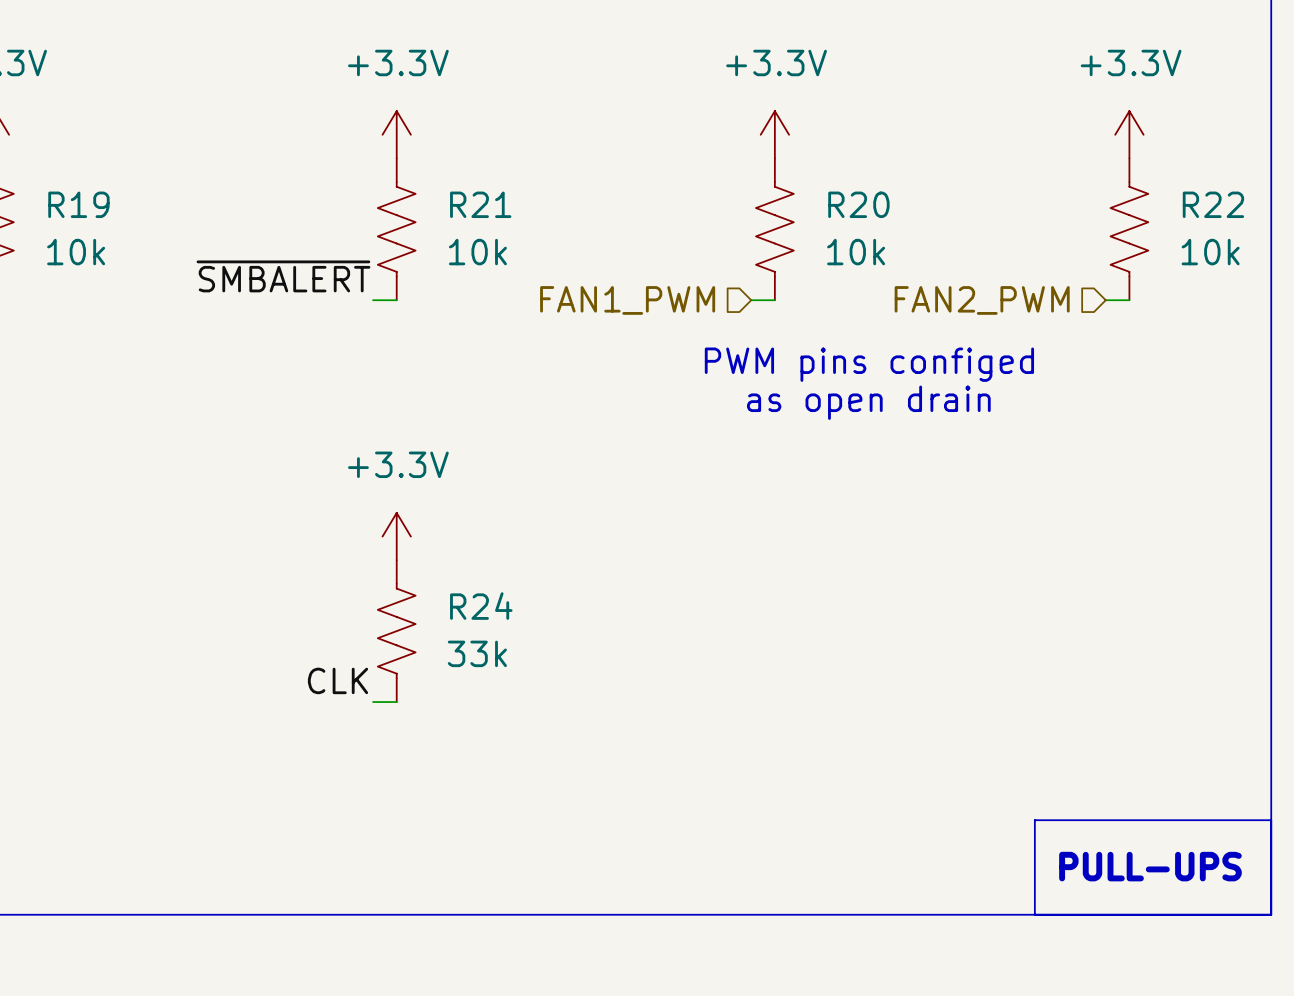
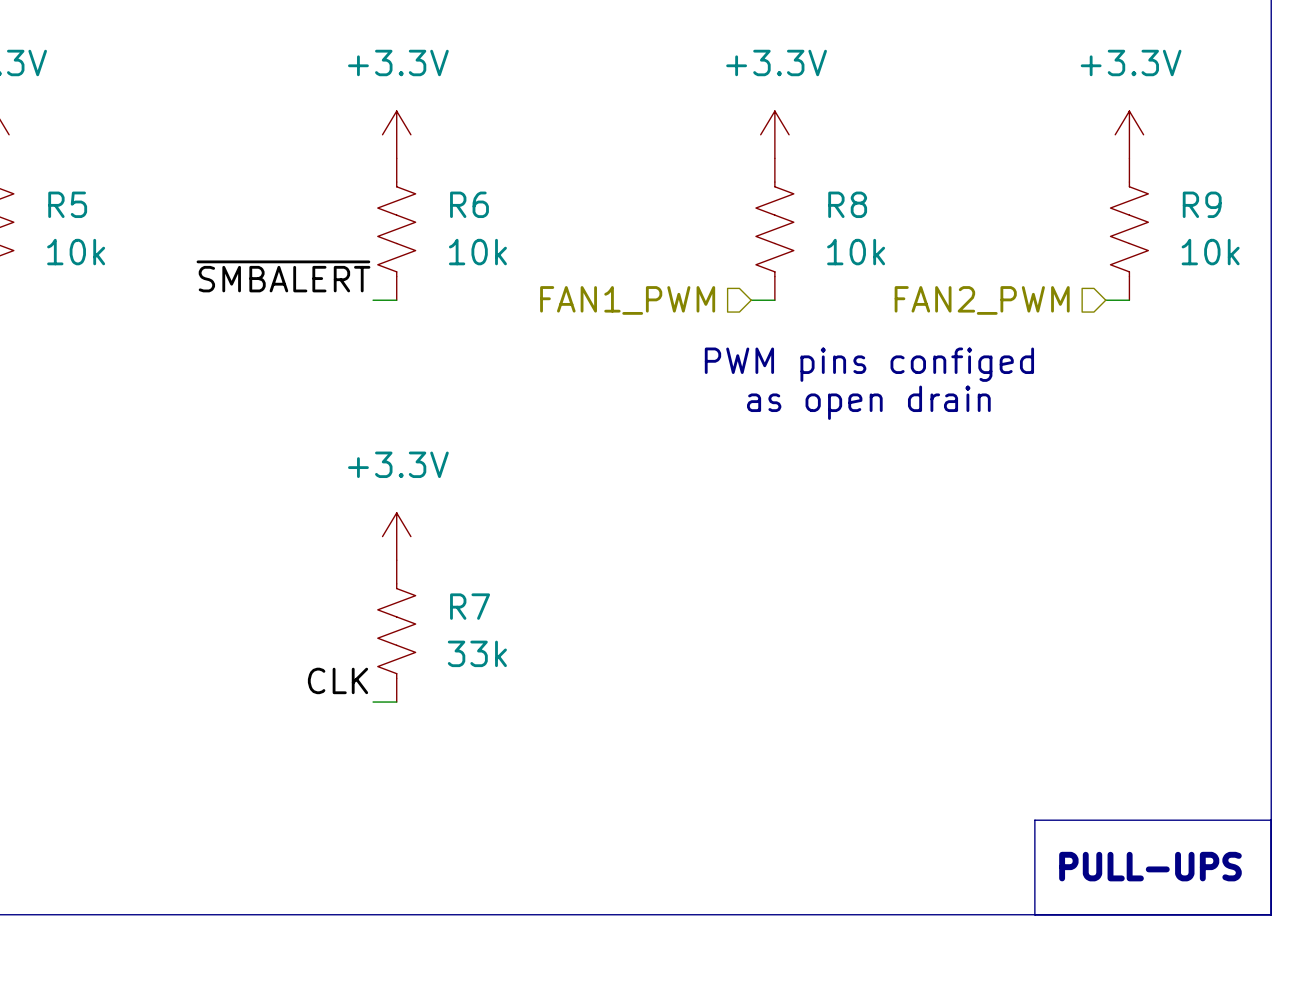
R19 name: R19 (78, 204) -> R5 (67, 204)
R21 name: R21 (480, 204) -> R6 (469, 204)
R20 name: R20 (858, 204) -> R8 (847, 204)
R22 name: R22 (1213, 204) -> R9 (1202, 204)
R24 name: R24 (481, 606) -> R7 (470, 606)

